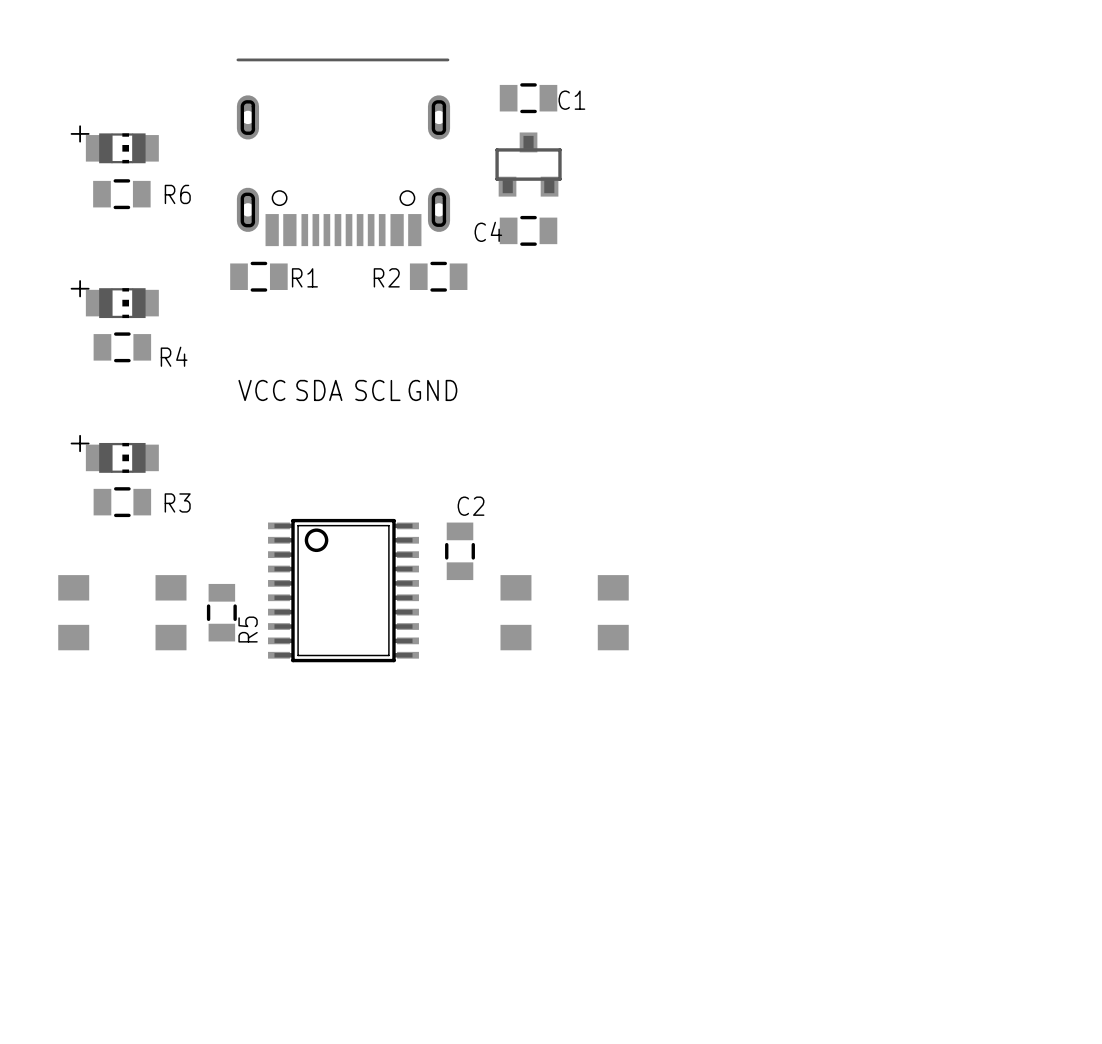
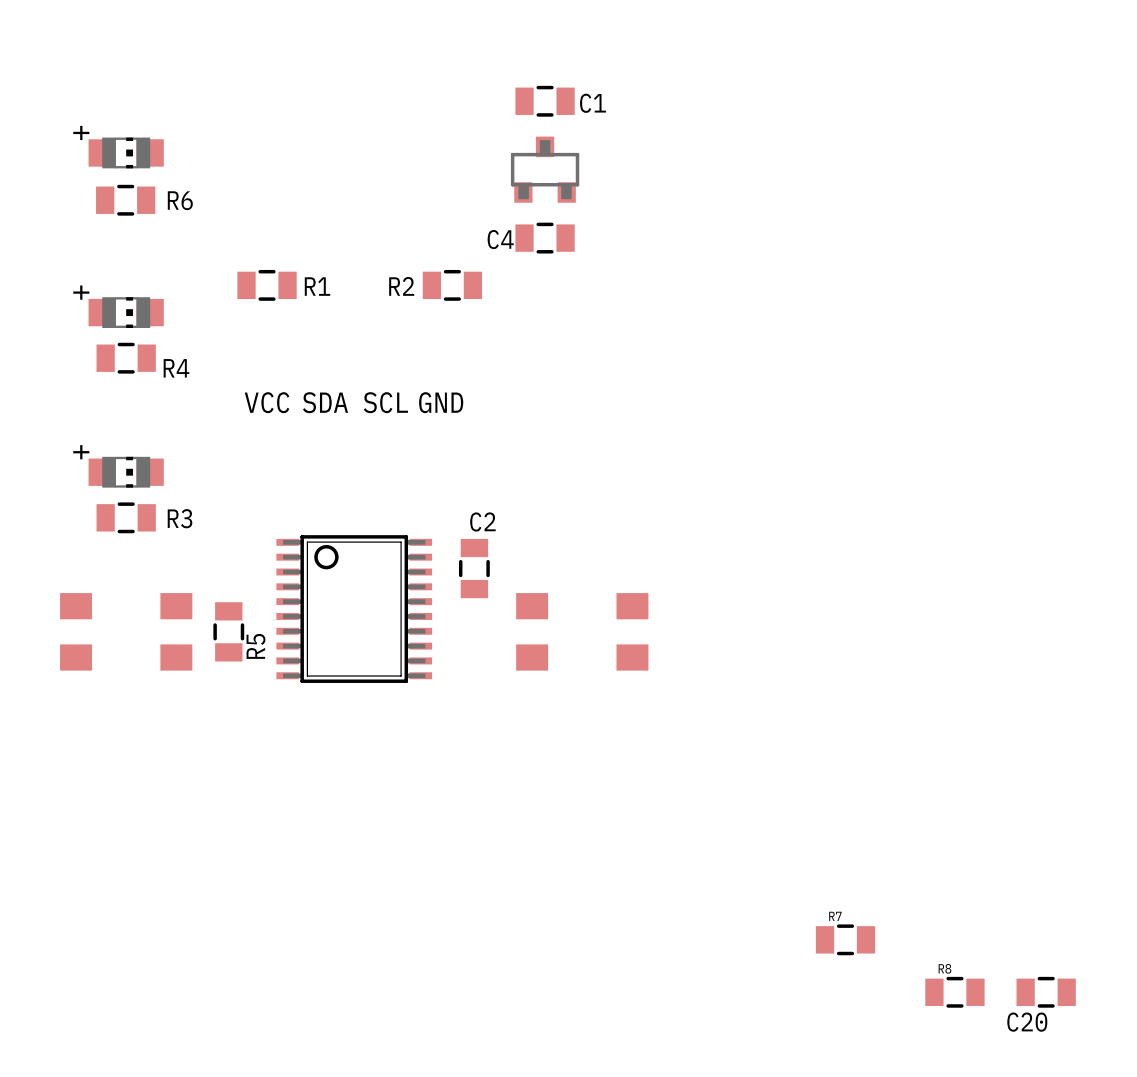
part: (343, 152) -> none
R7: none -> (845, 939)
R8: none -> (954, 992)
C20: none -> (1046, 992)

